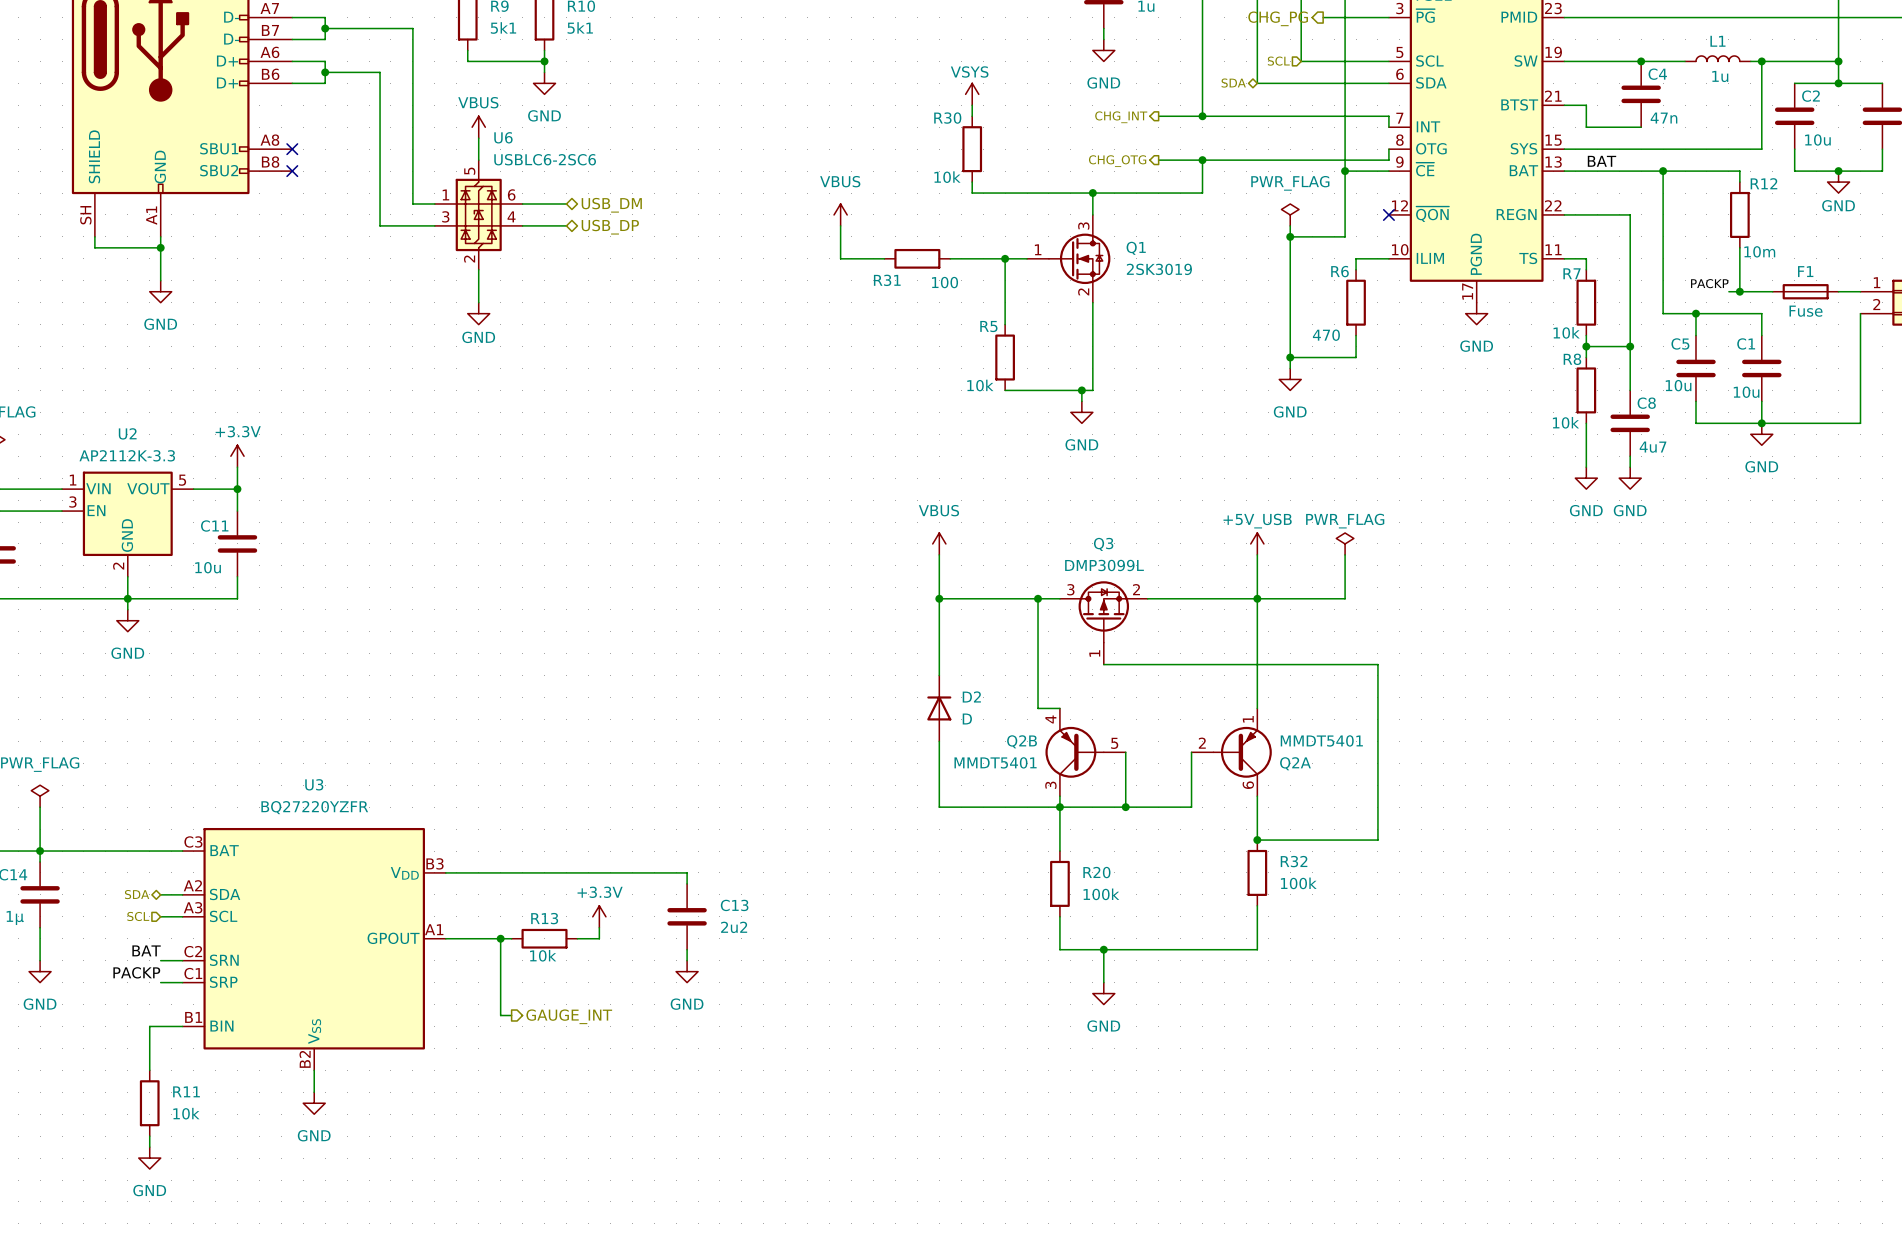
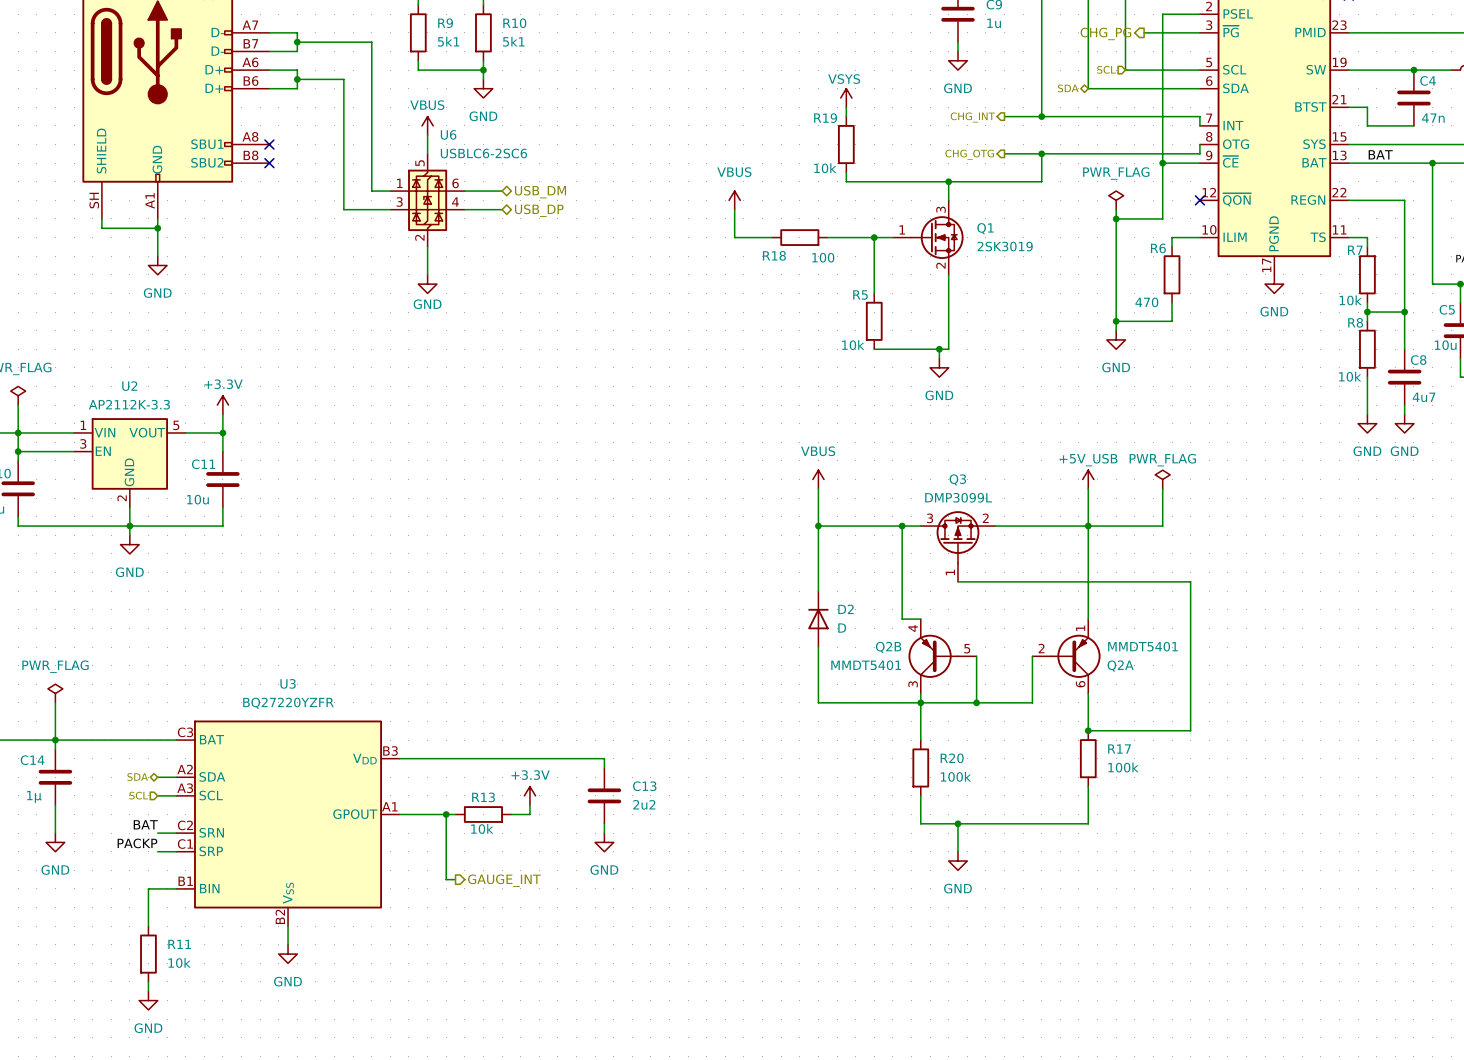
R30 name: R30 (947, 118) -> R19 (825, 118)
R31 name: R31 (887, 280) -> R18 (774, 255)
R32 name: R32 (1294, 861) -> R17 (1119, 749)

